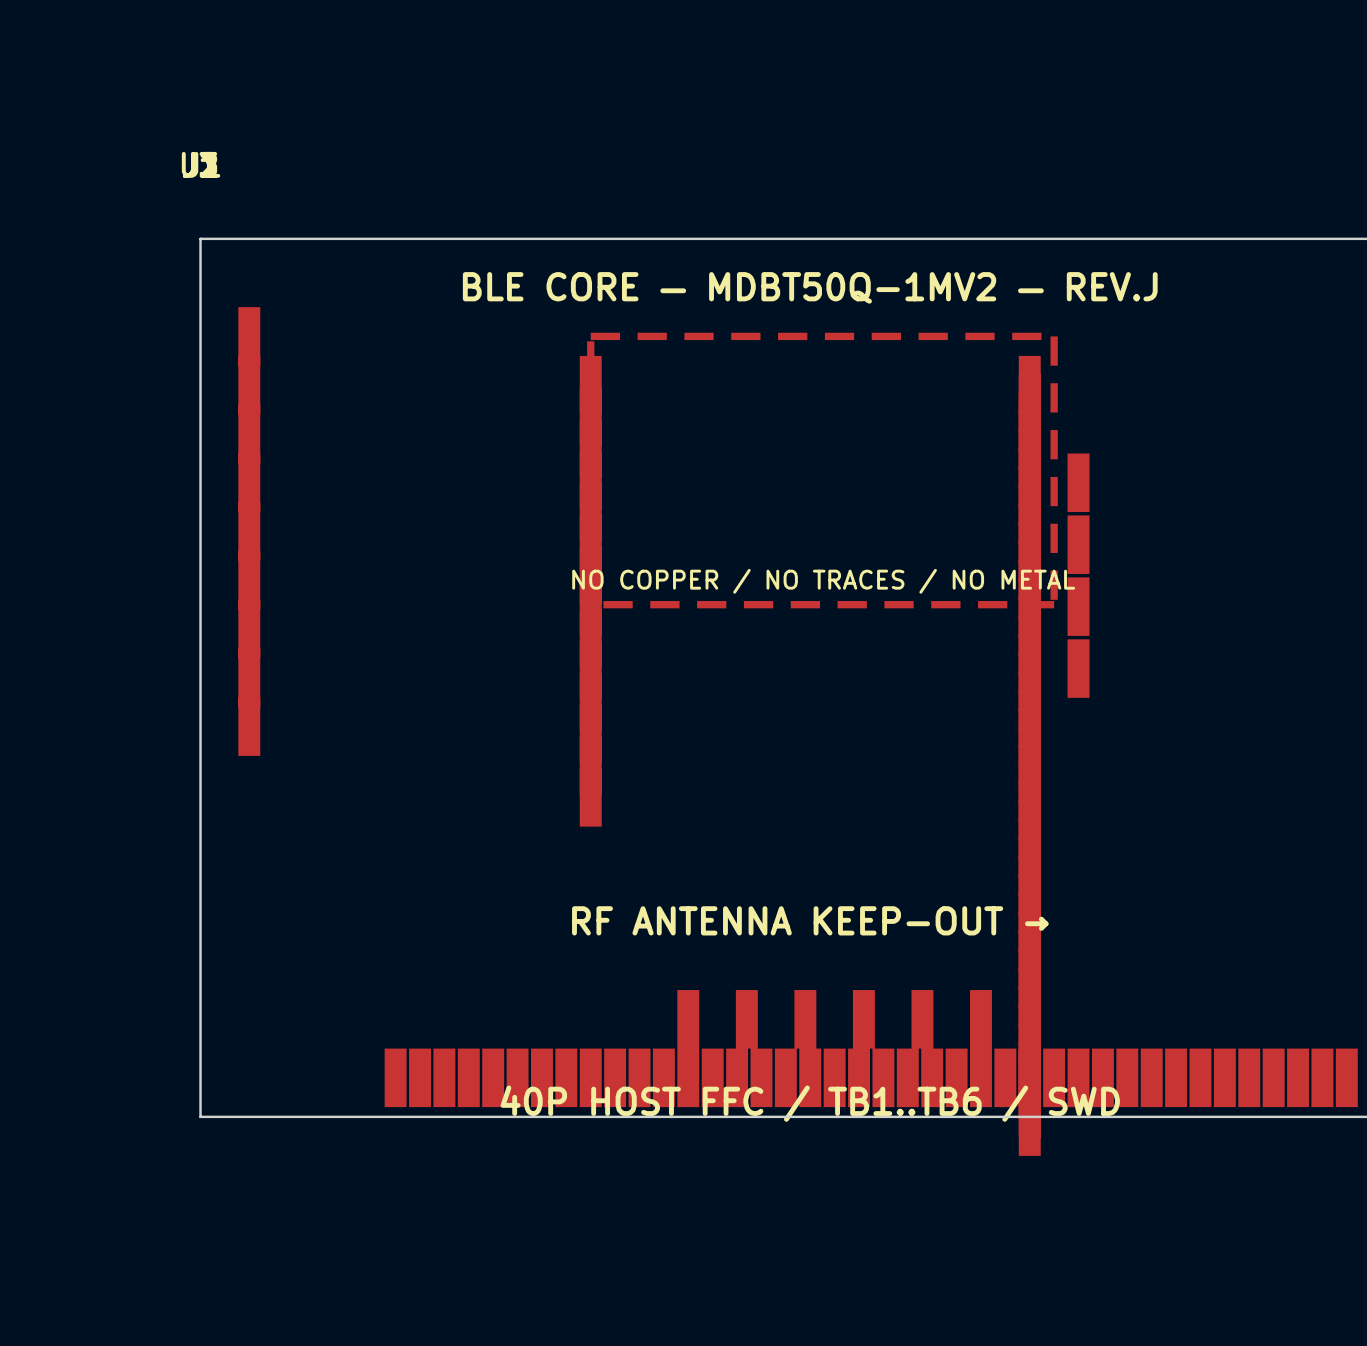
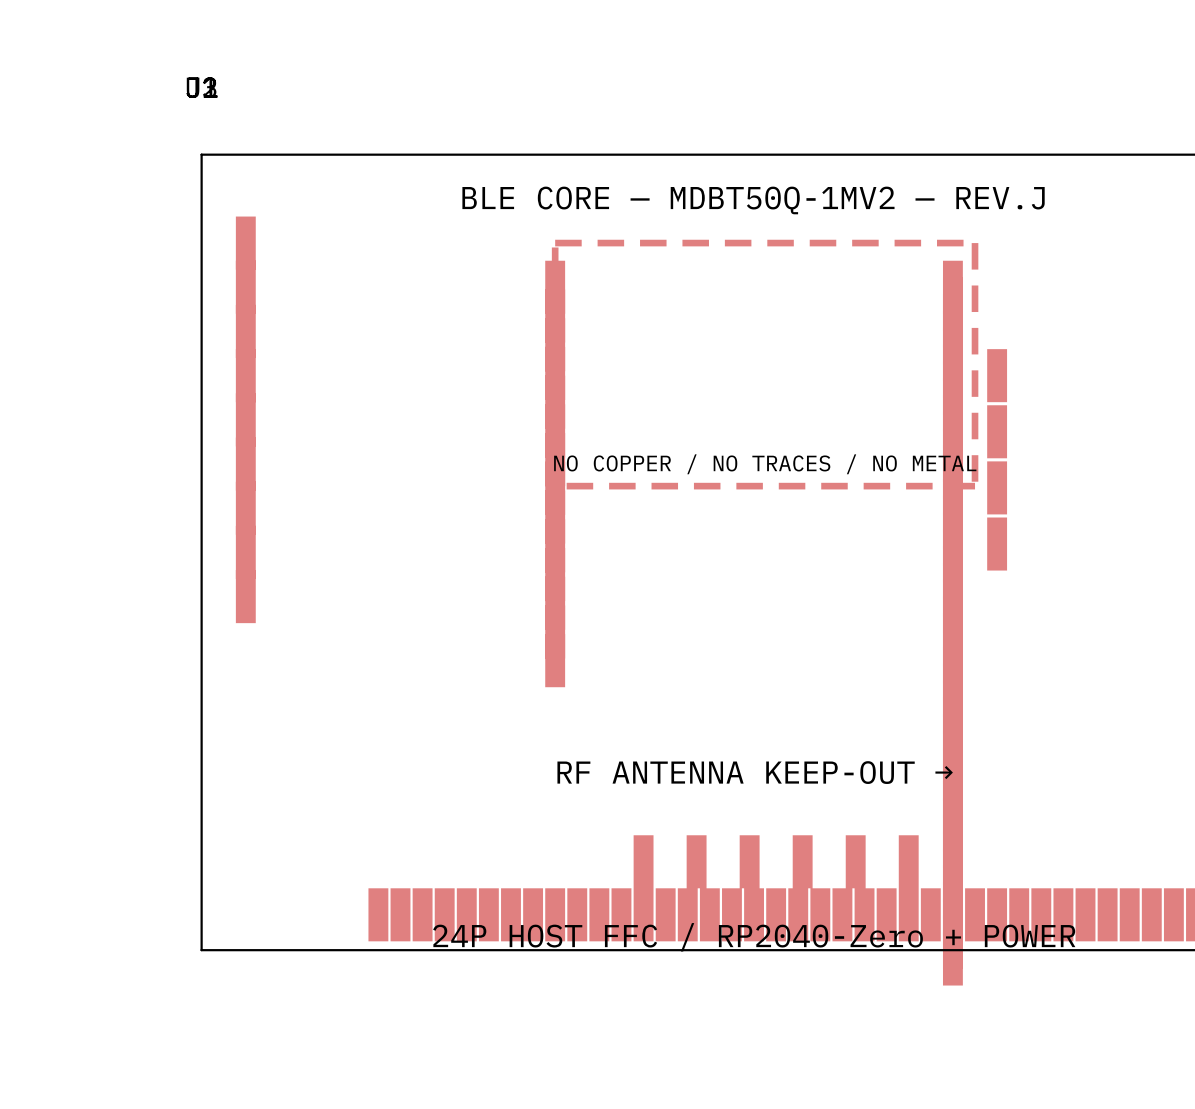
text: 40P HOST FFC / TB1..TB6 / SWD (810, 1103) -> 24P HOST FFC / RP2040-Zero + POWER (754, 937)

